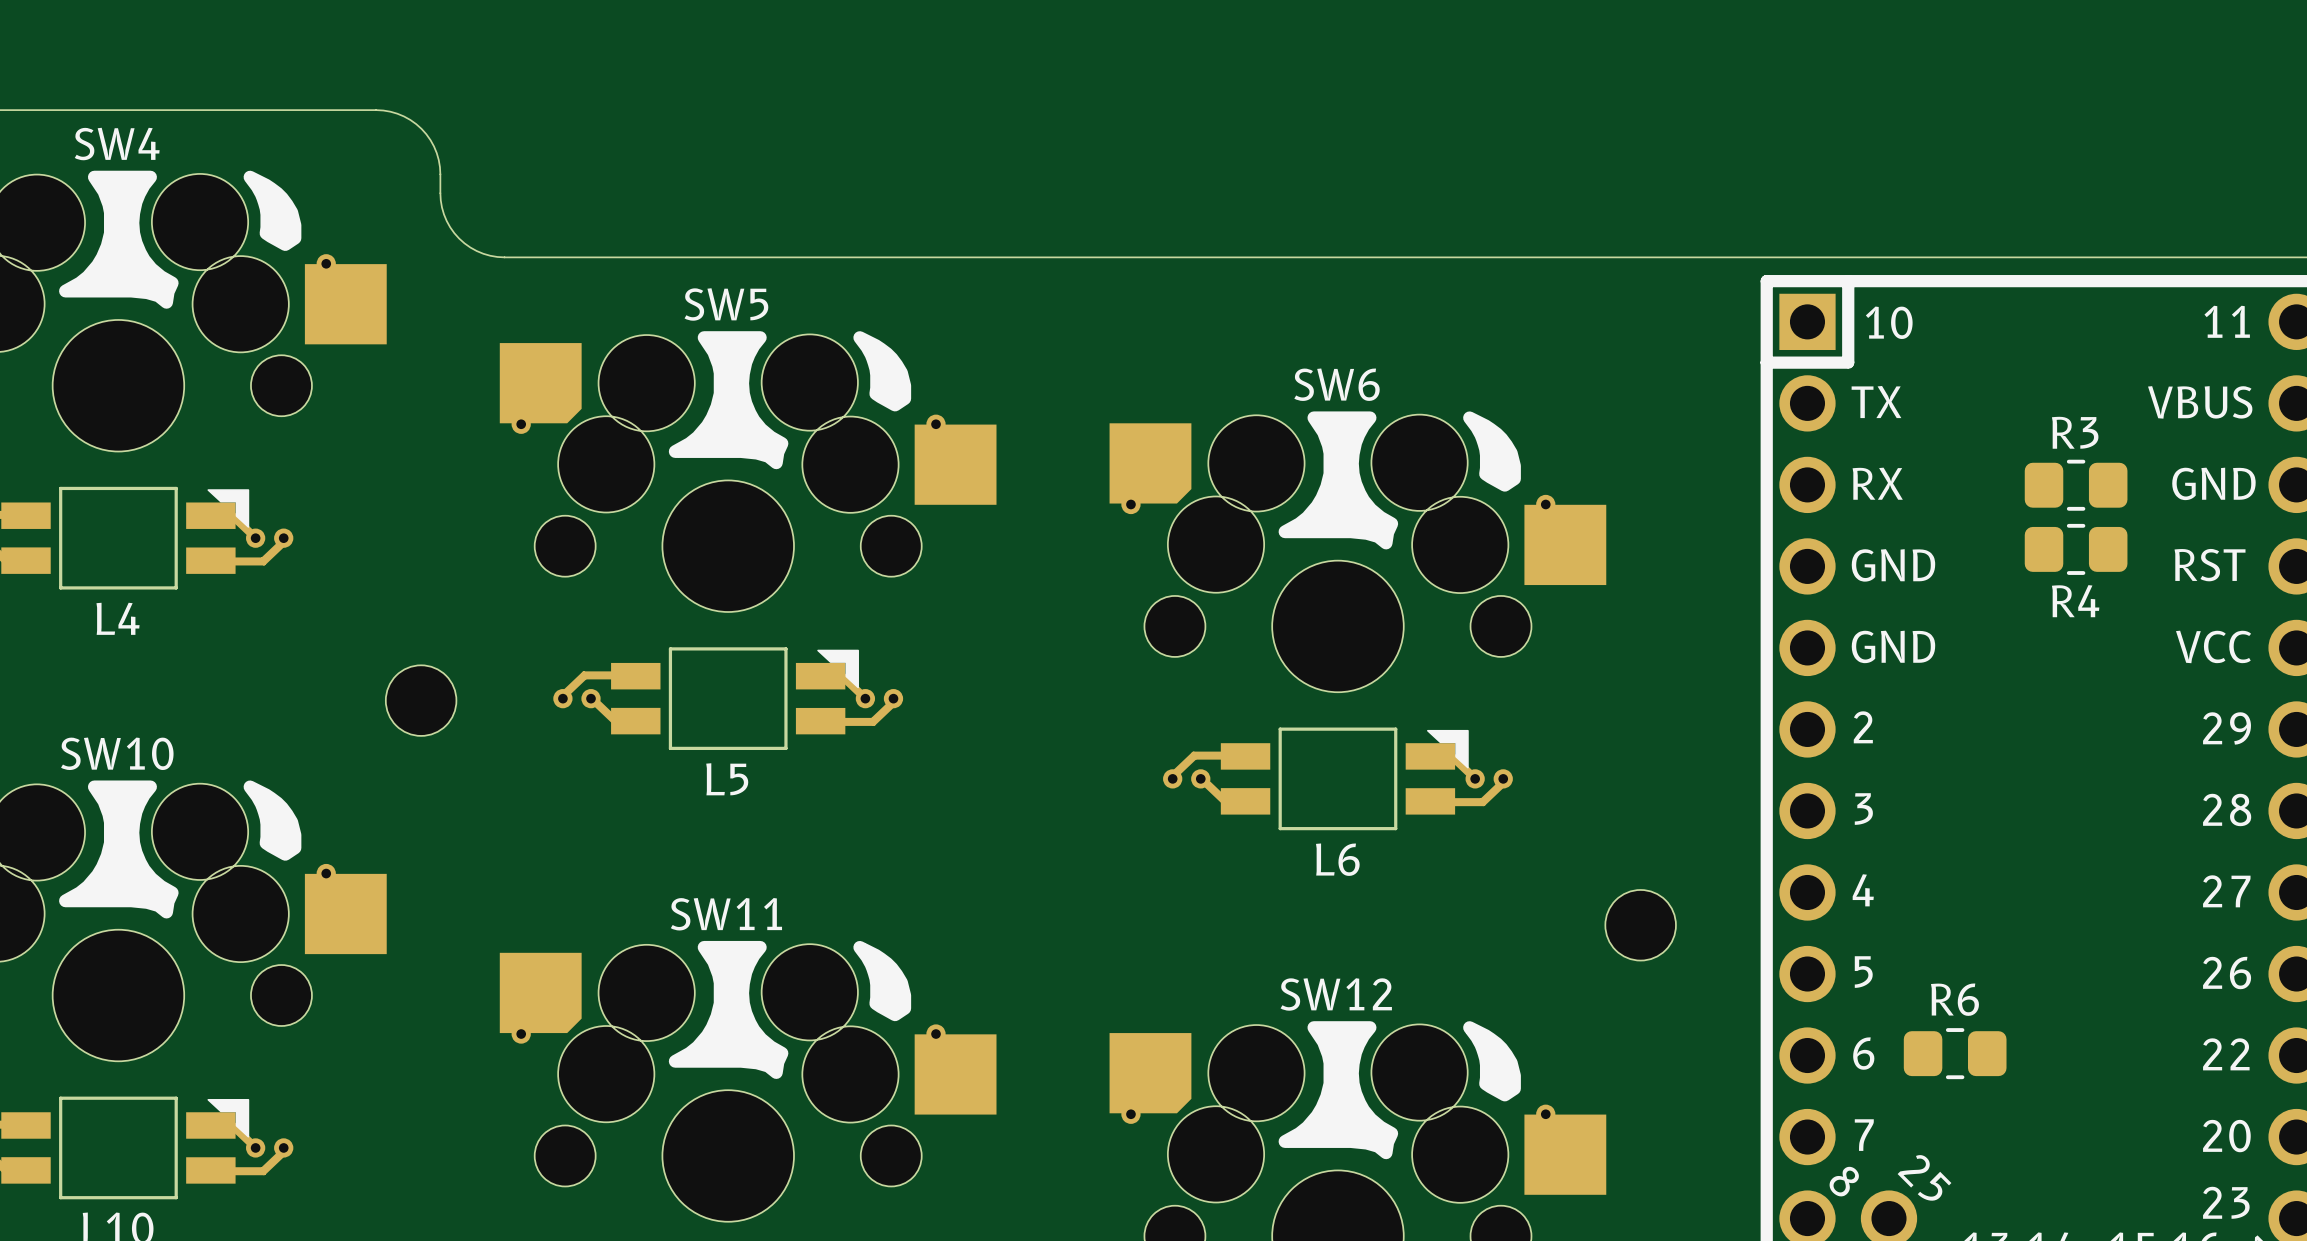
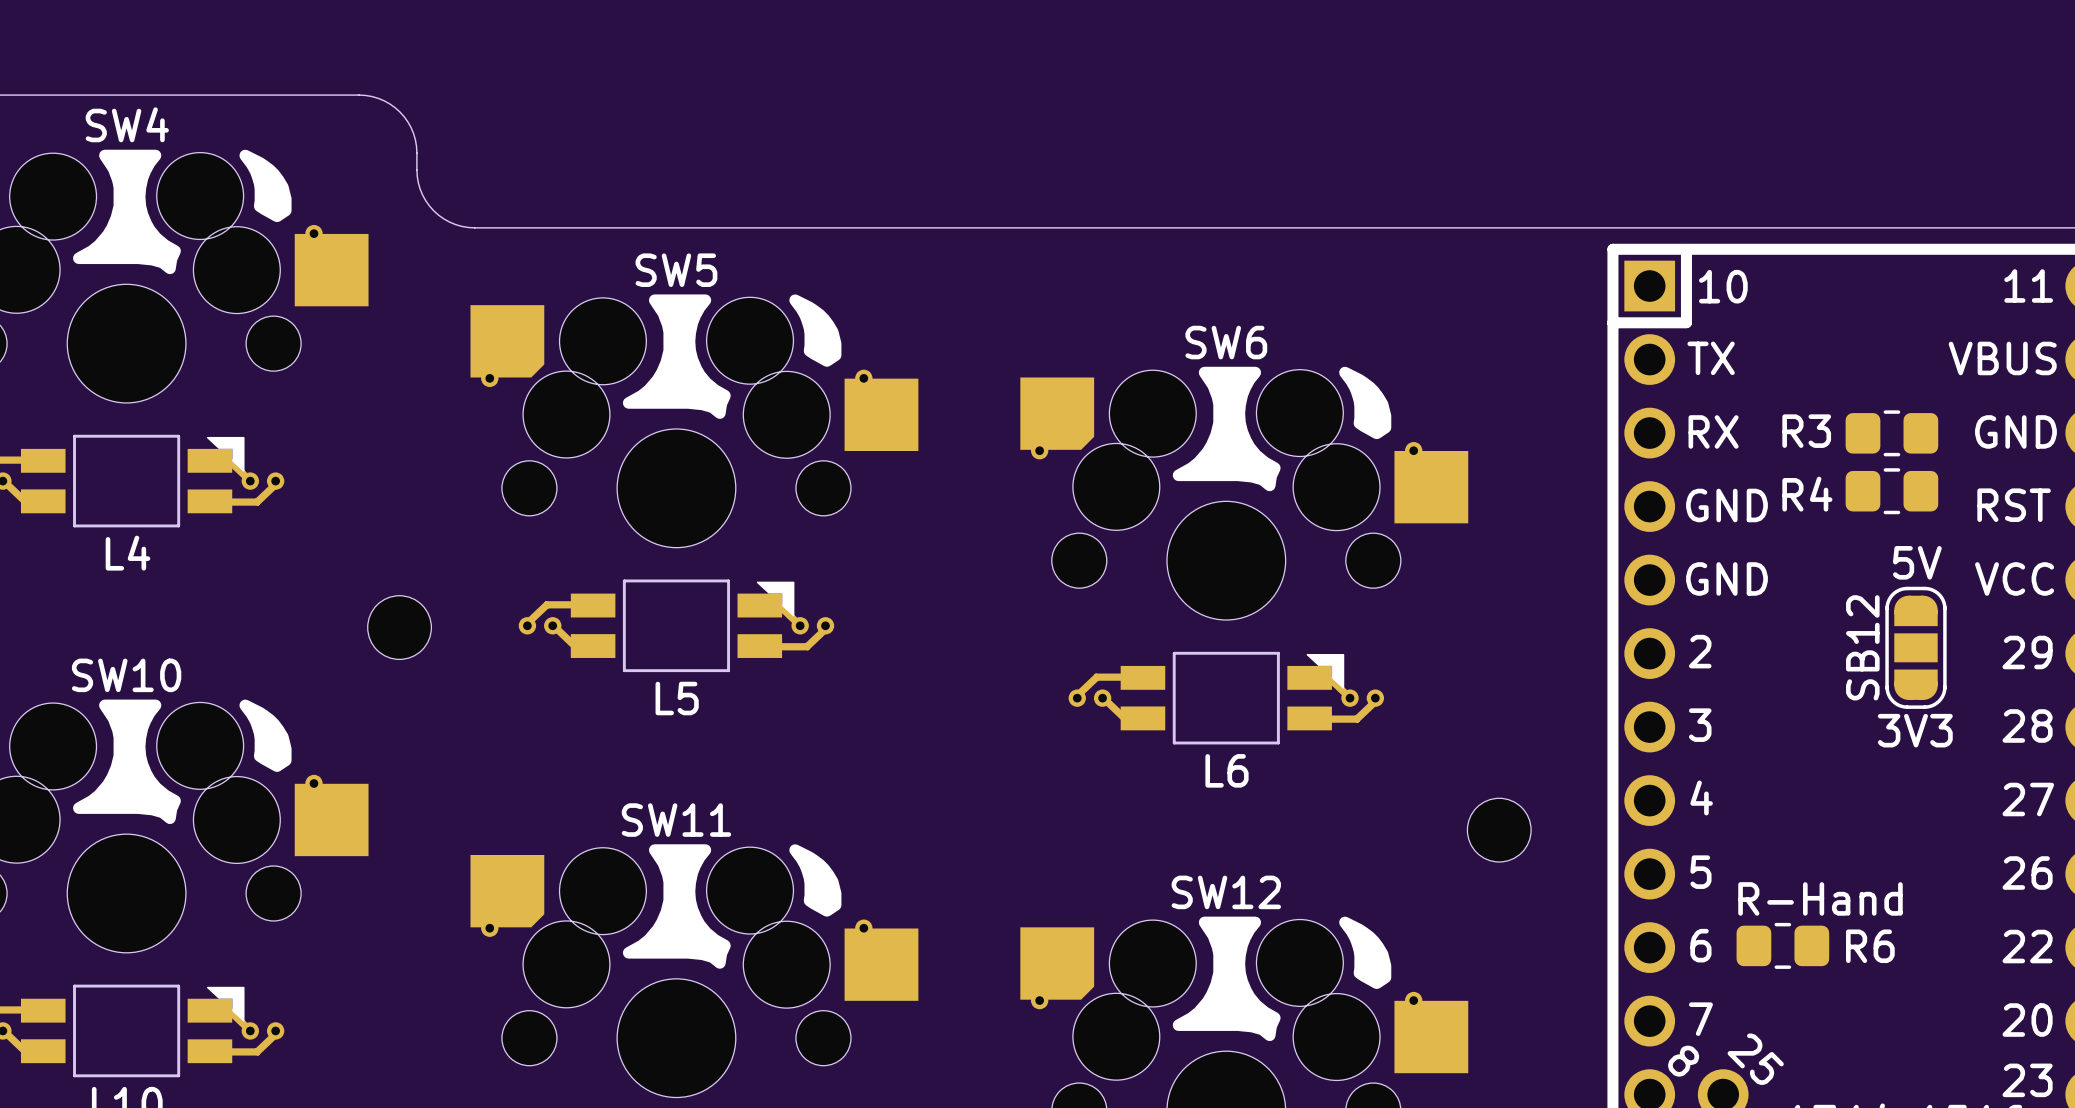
R3 name position: R3 (2075, 432) -> R3 (1806, 431)
R4 name position: R4 (2075, 601) -> R4 (1807, 494)
SB12: none -> (1915, 647)
R6 name position: R6 (1954, 999) -> R6 (1870, 946)
text: none -> R-Hand (1820, 898)

